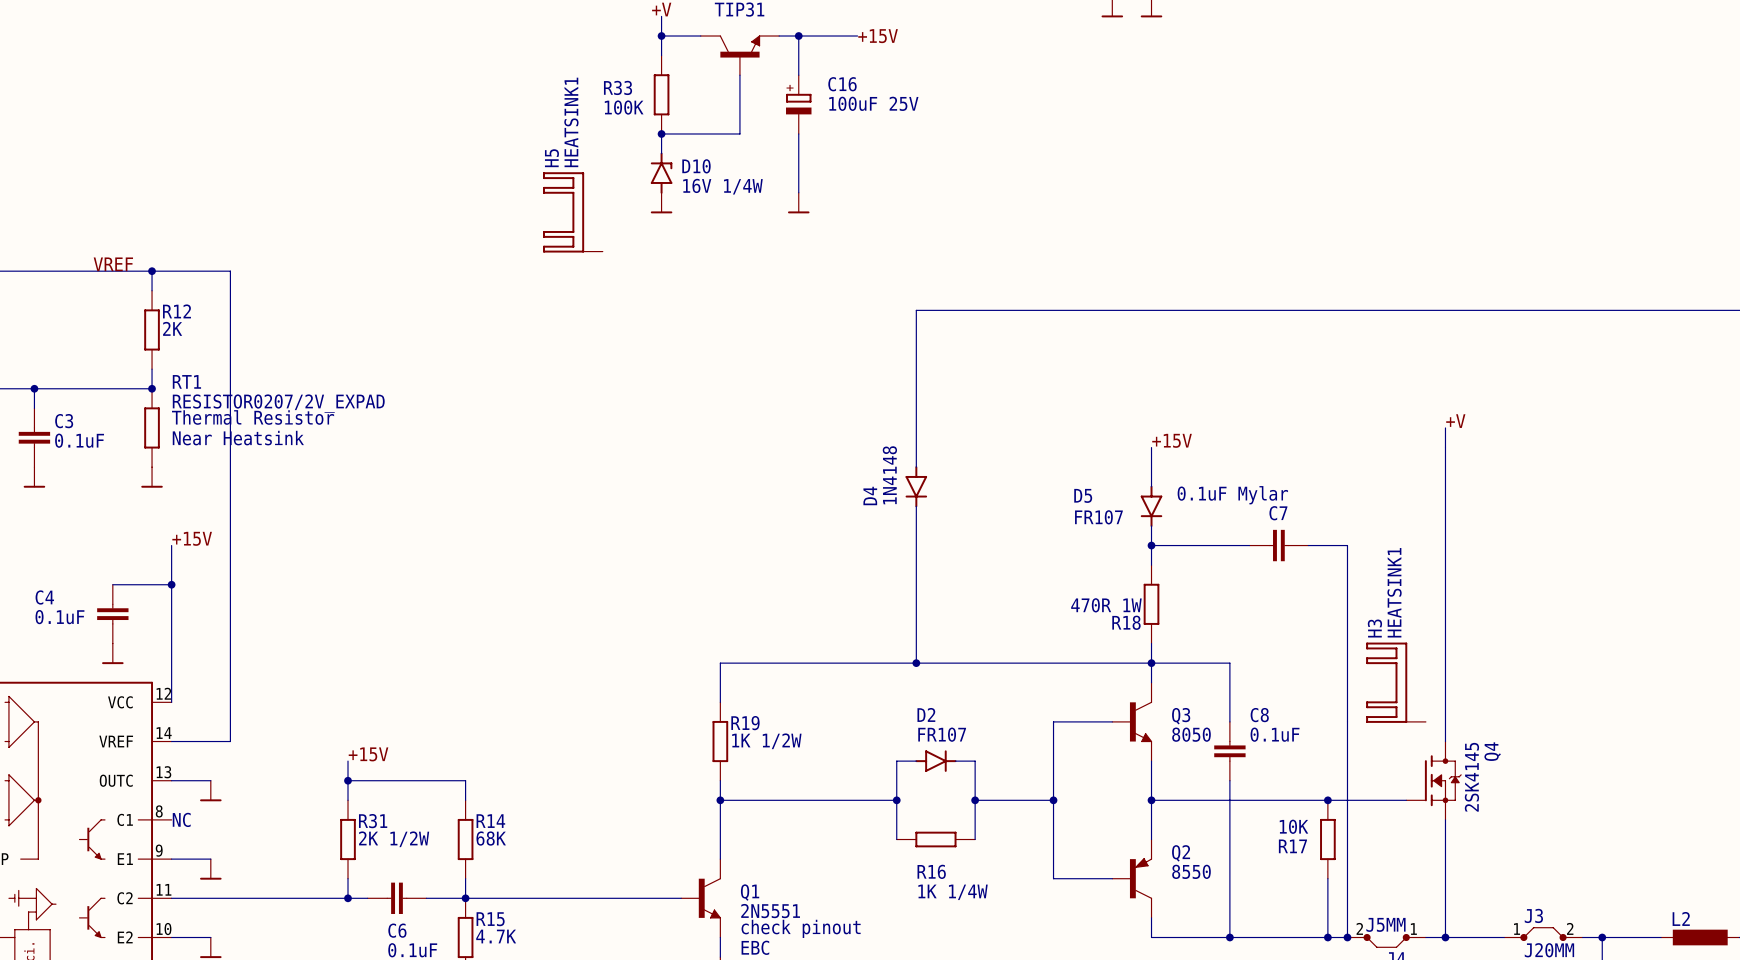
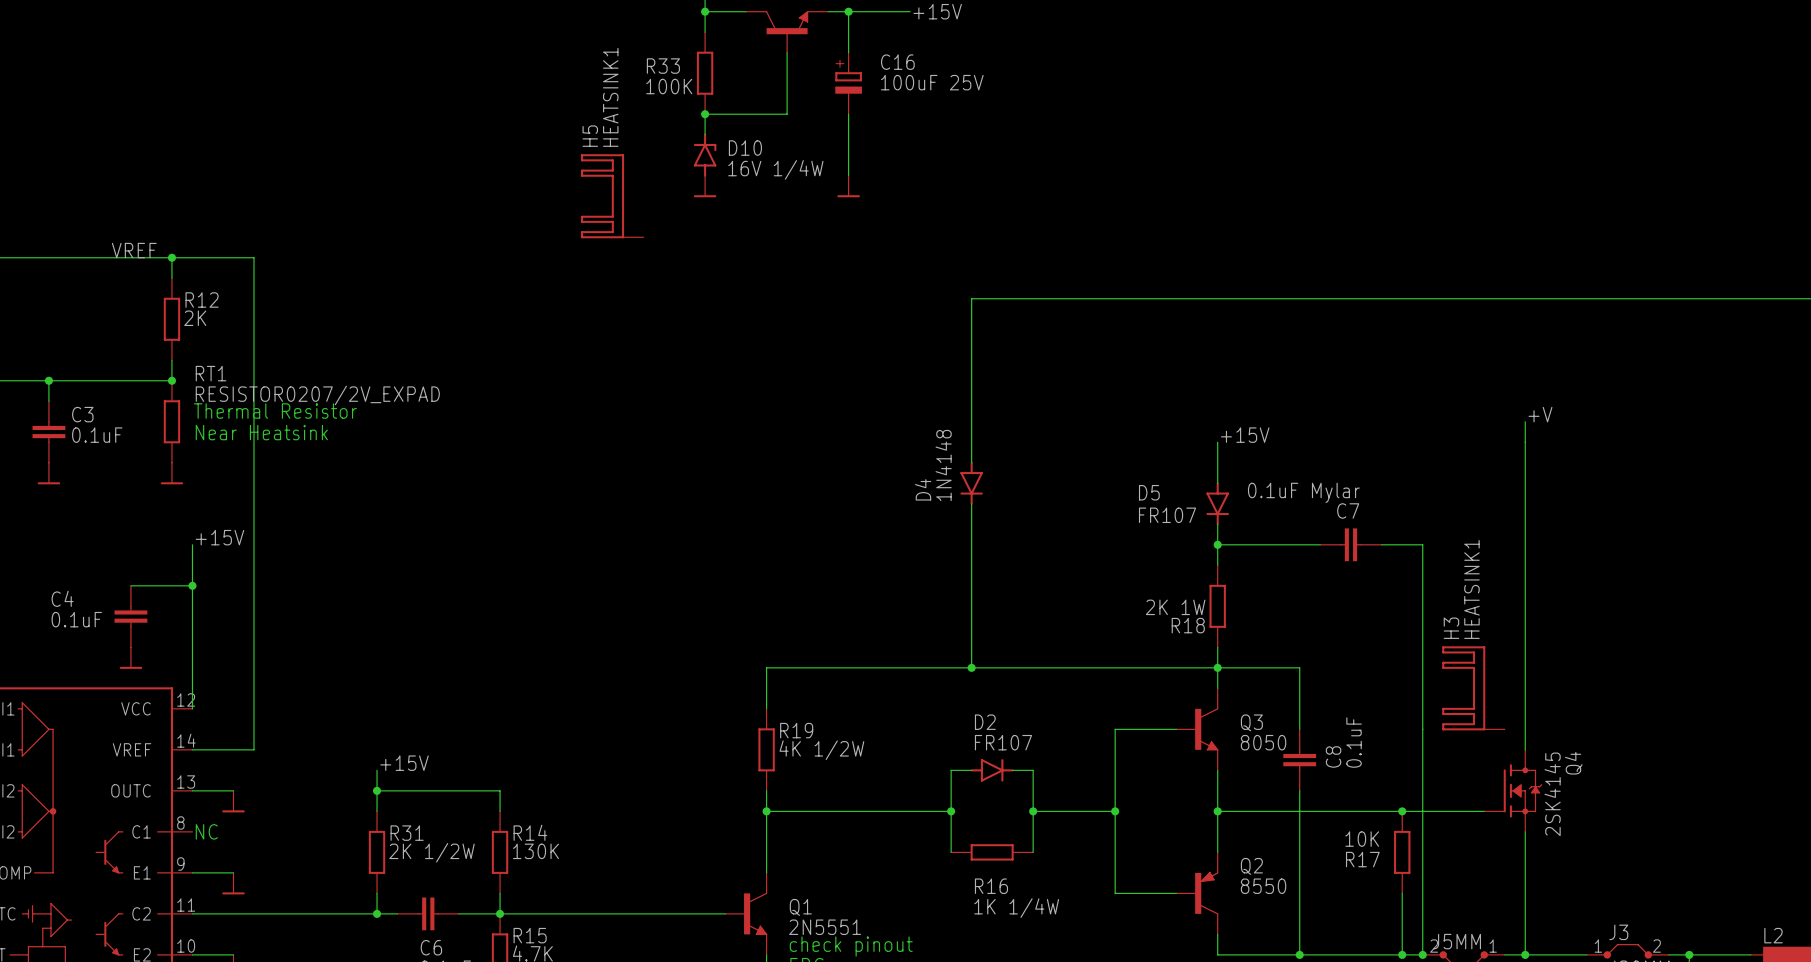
R18 value: 470R 1W (1106, 605) -> 2K 1W (1175, 607)
C8 name rotation: 0° (1259, 715) -> 90° counterclockwise (1333, 757)
C8 value rotation: 0° (1275, 734) -> 90° counterclockwise (1354, 742)
R19 value: 1K 1/2W (766, 741) -> 4K 1/2W (821, 750)
R14 value: 68K (491, 838) -> 130K (535, 851)

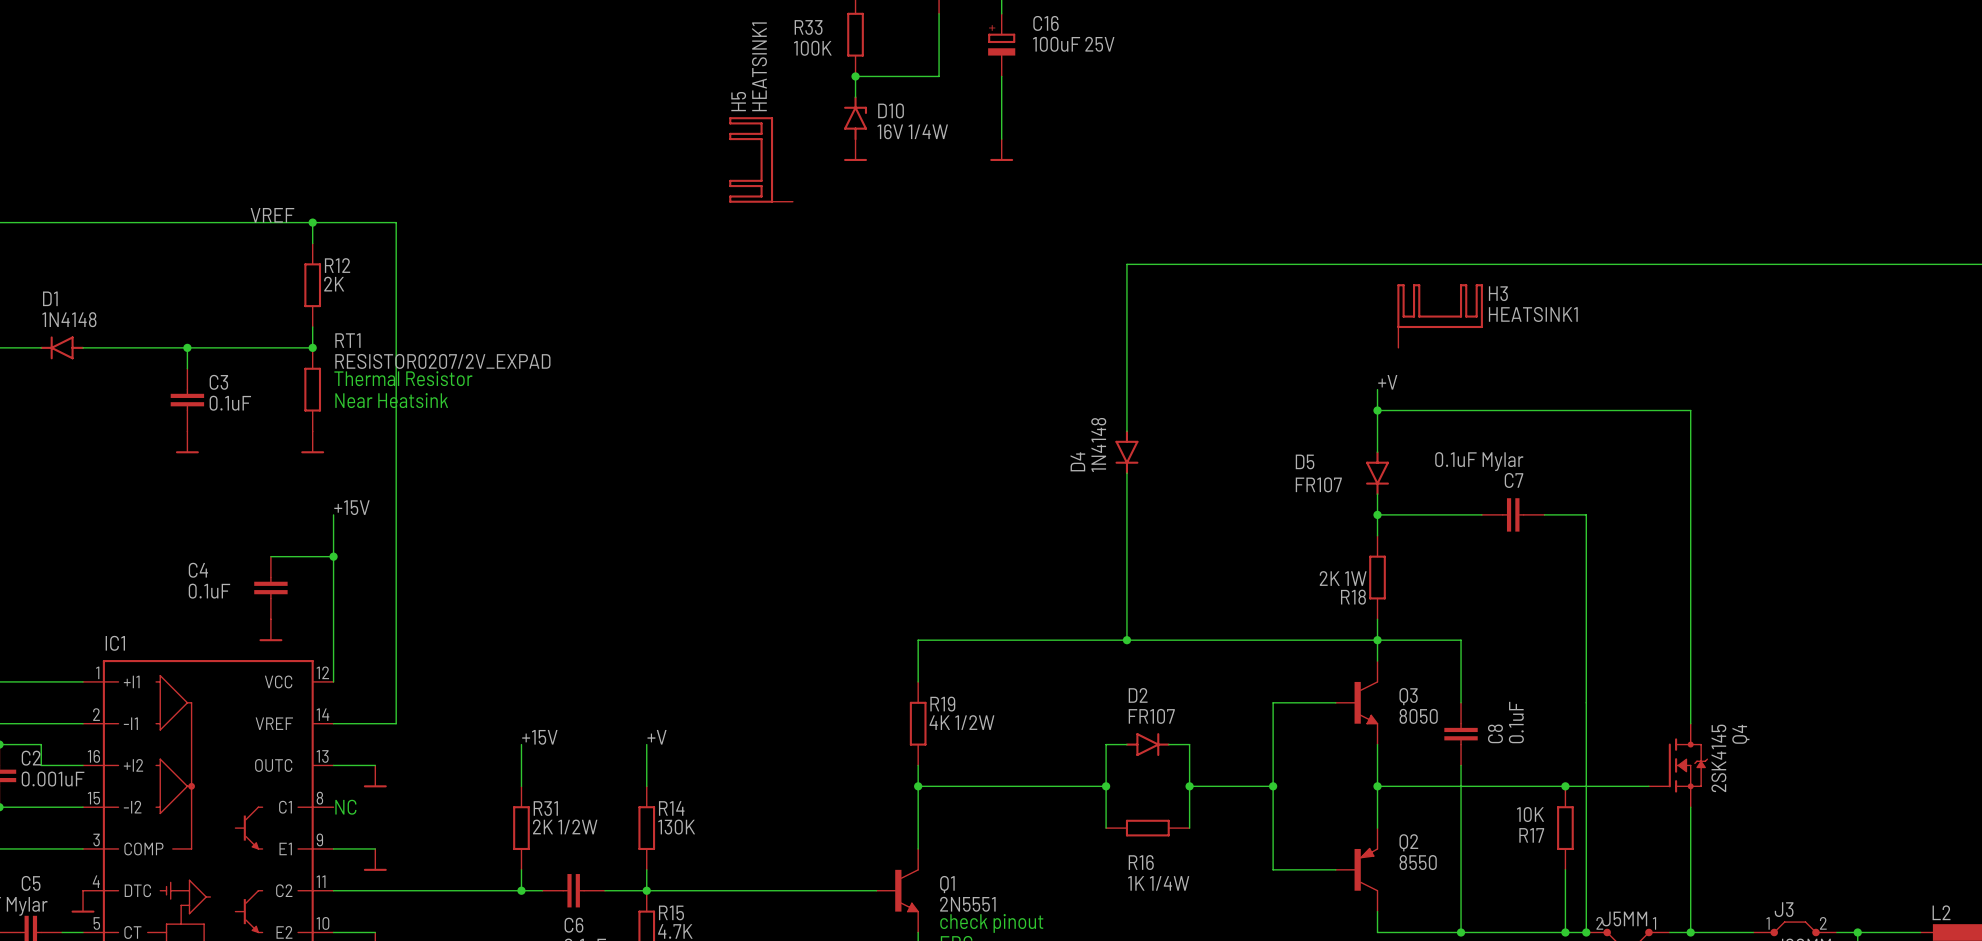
label: +V (1540, 414) -> none
wire: (1525, 421) (1525, 442) -> (1377, 389) (1377, 410) (1690, 410)
label: +15V (1245, 435) -> +V (1387, 382)
junction: none -> (1377, 410)
H3 rotation: 0° (1463, 688) -> 90° clockwise (1440, 306)
H3 position: (1473, 688) -> (1440, 316)
label: none -> +V (657, 737)
wire: (377, 790) (500, 790) -> (646, 744) (646, 765)
junction: (377, 790) -> none

